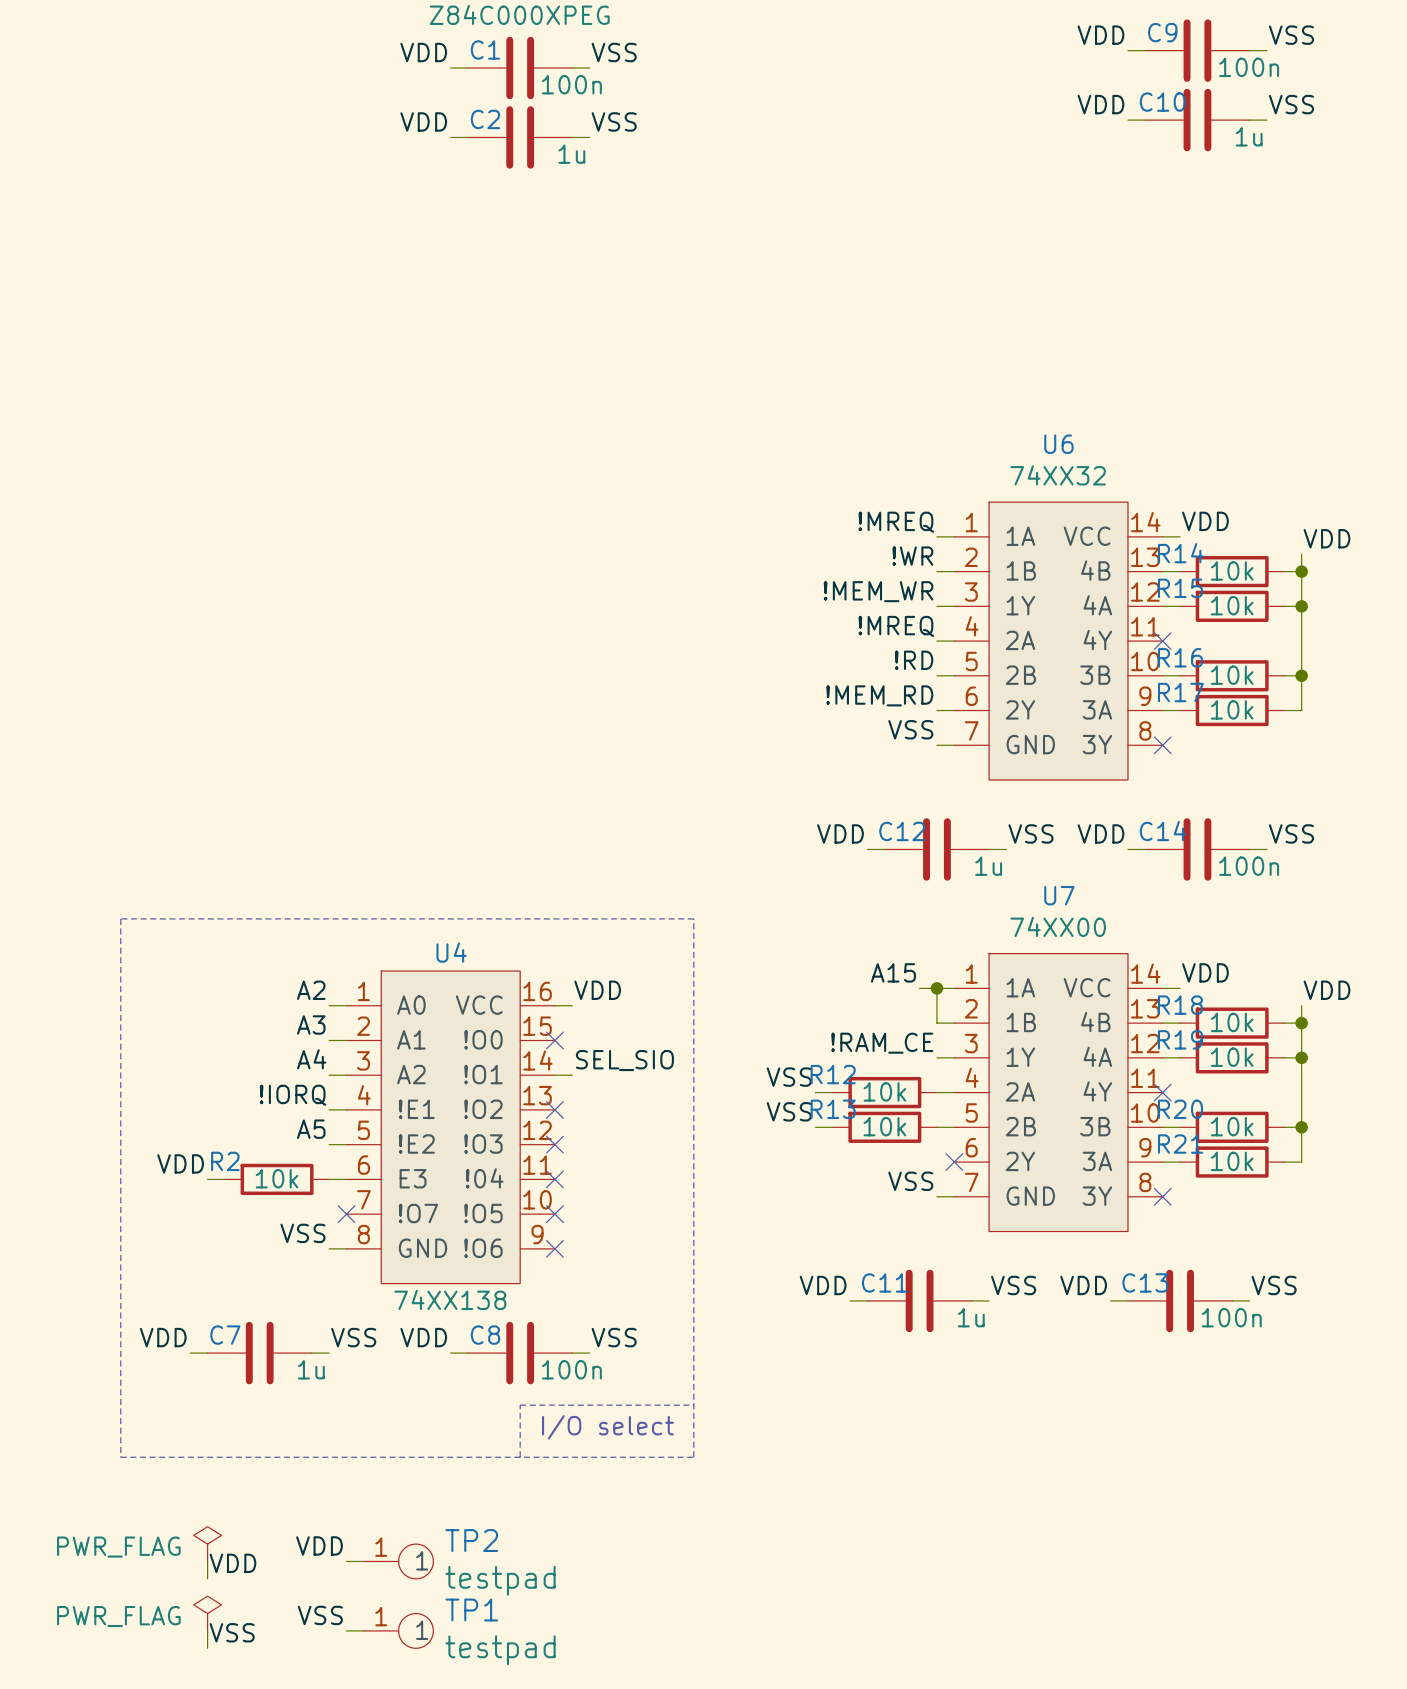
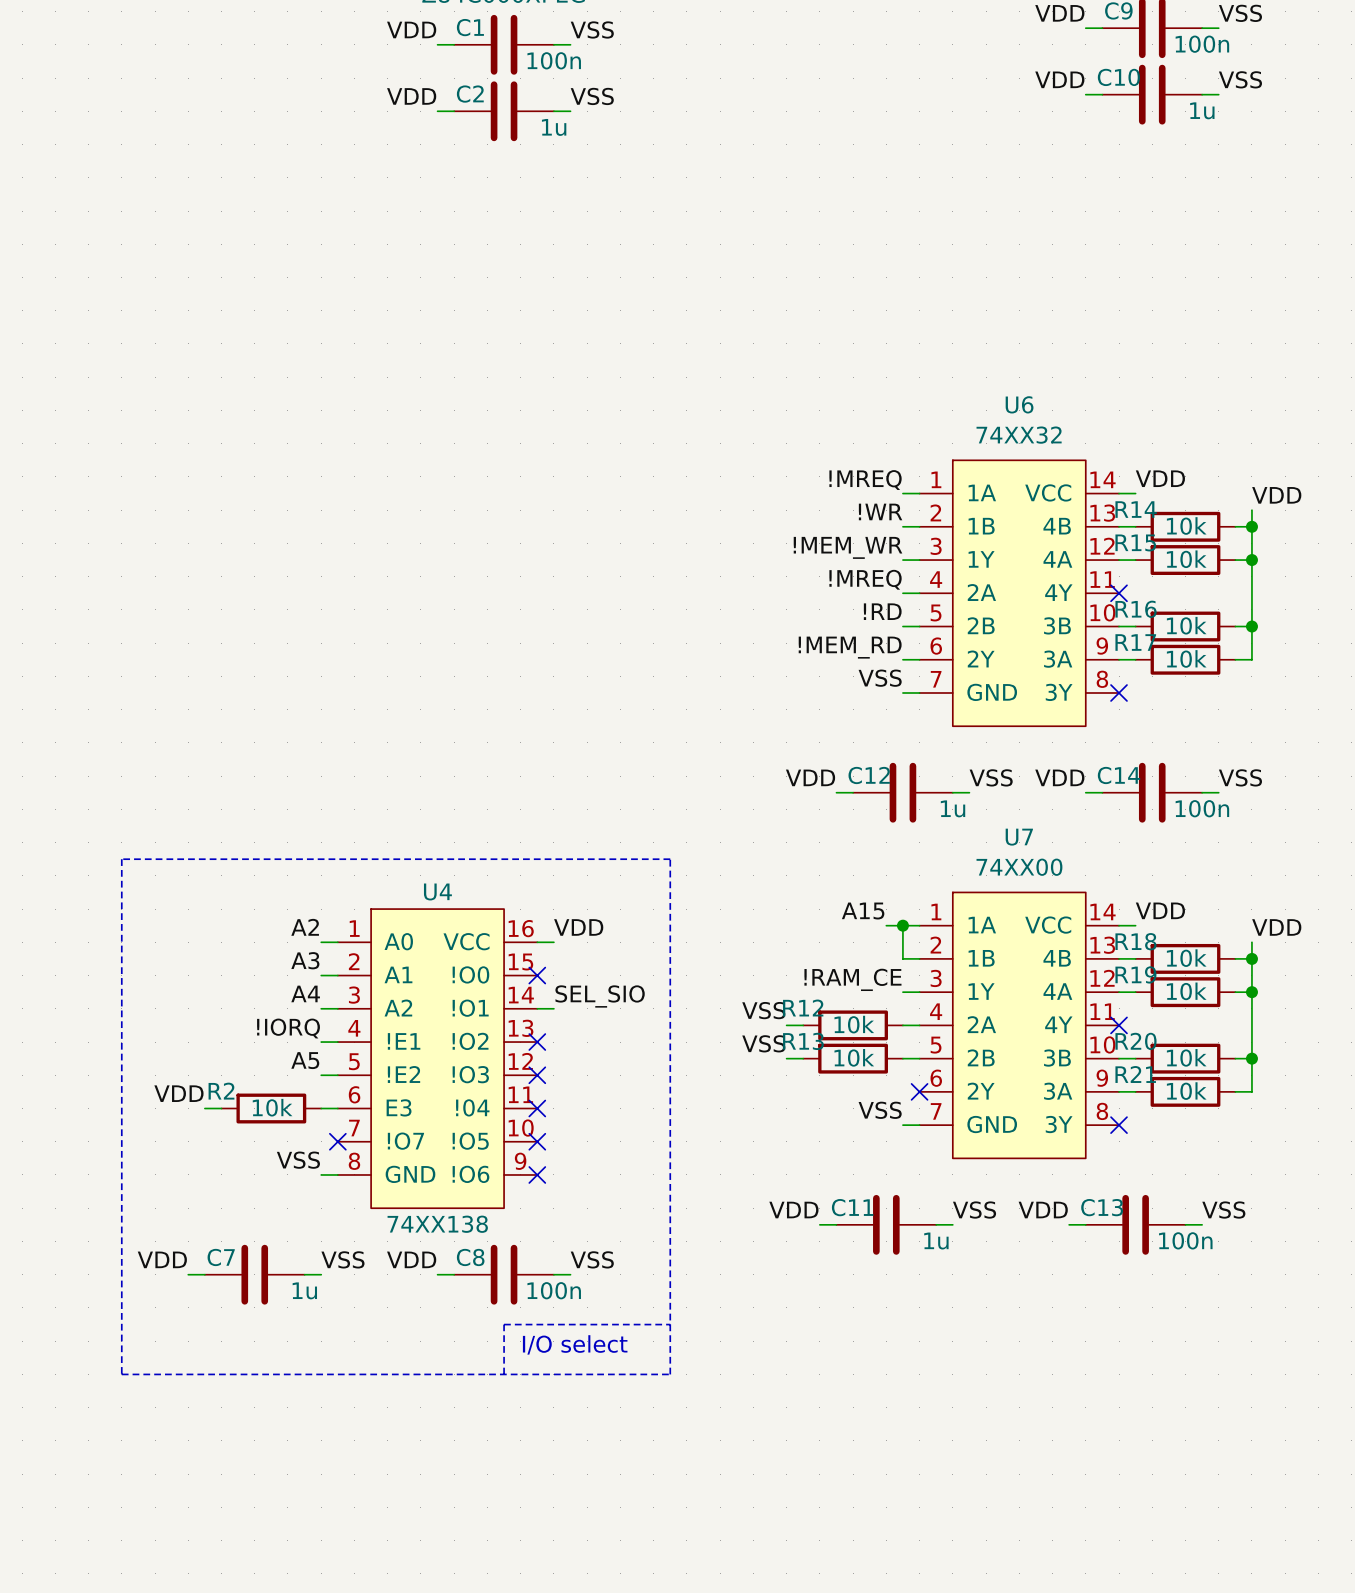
power symbol: PWR_FLAG (207, 1544) -> none
label: VDD (319, 1545) -> none
wire: (207, 1561) (207, 1578) -> none
wire: (346, 1561) (363, 1561) -> none
TP2: testpad (398, 1561) -> none
label: VDD (232, 1563) -> none
power symbol: PWR_FLAG (207, 1613) -> none
label: VSS (320, 1615) -> none
wire: (207, 1630) (207, 1648) -> none
wire: (346, 1630) (363, 1630) -> none
TP1: testpad (398, 1630) -> none
label: VSS (232, 1632) -> none

